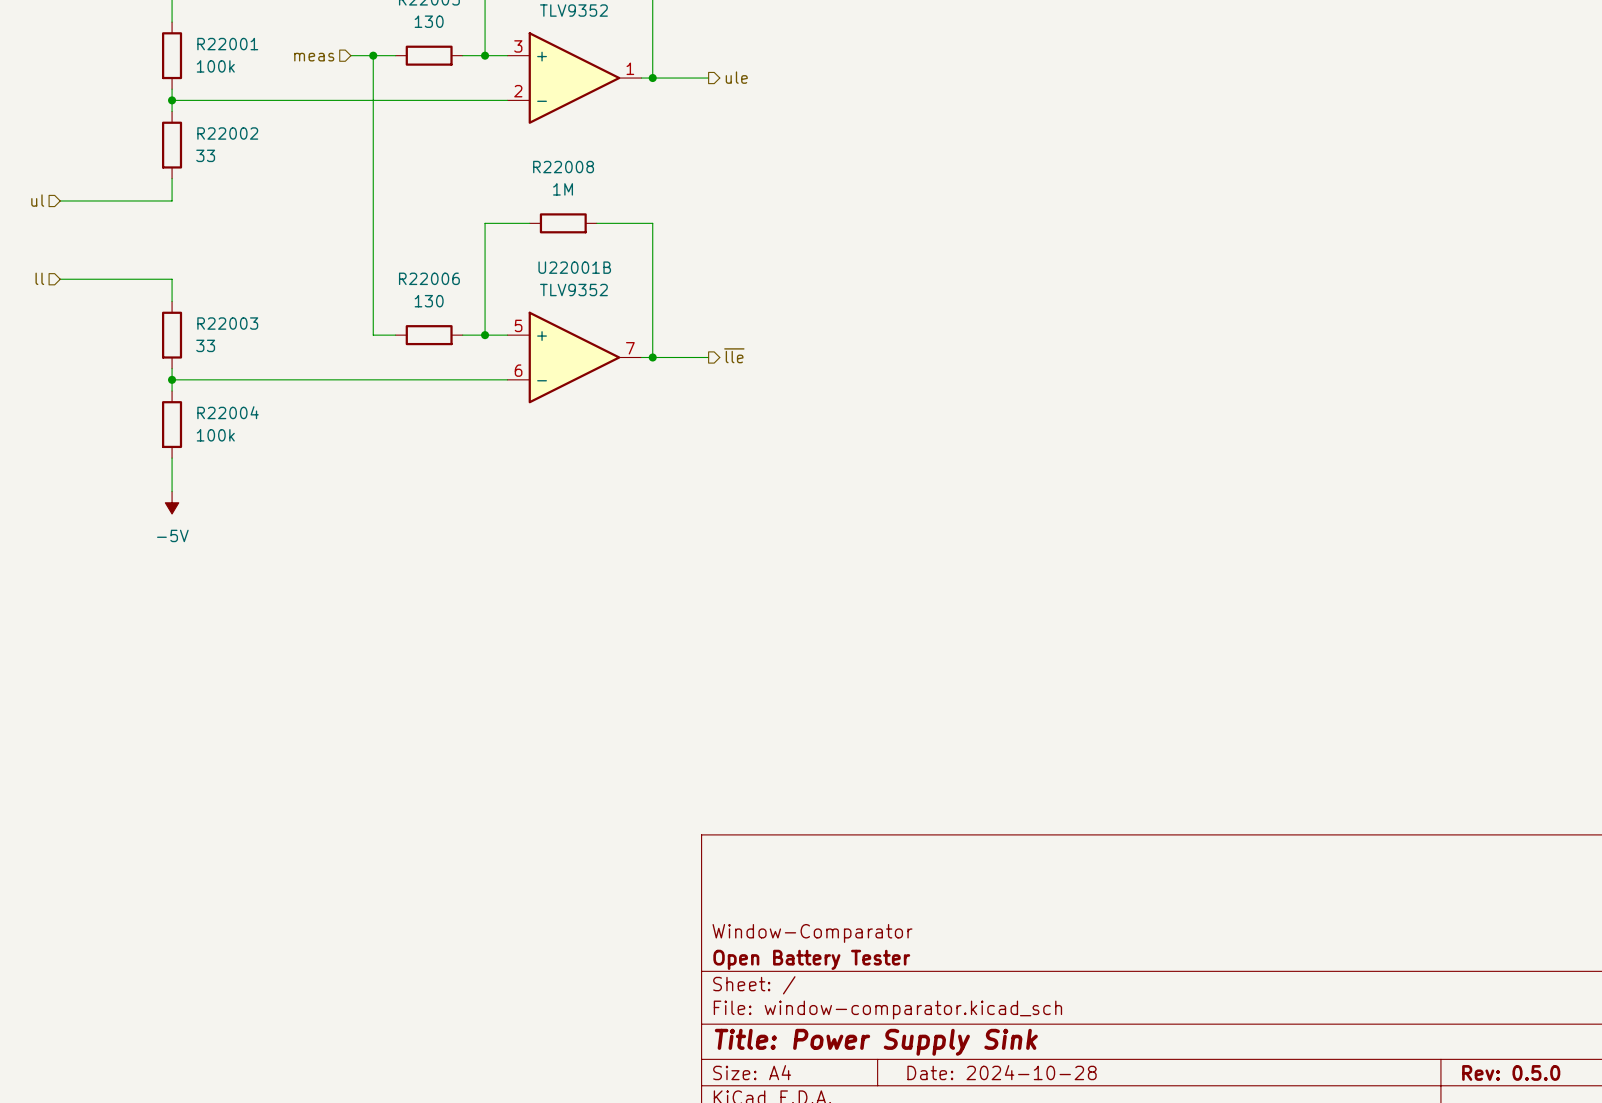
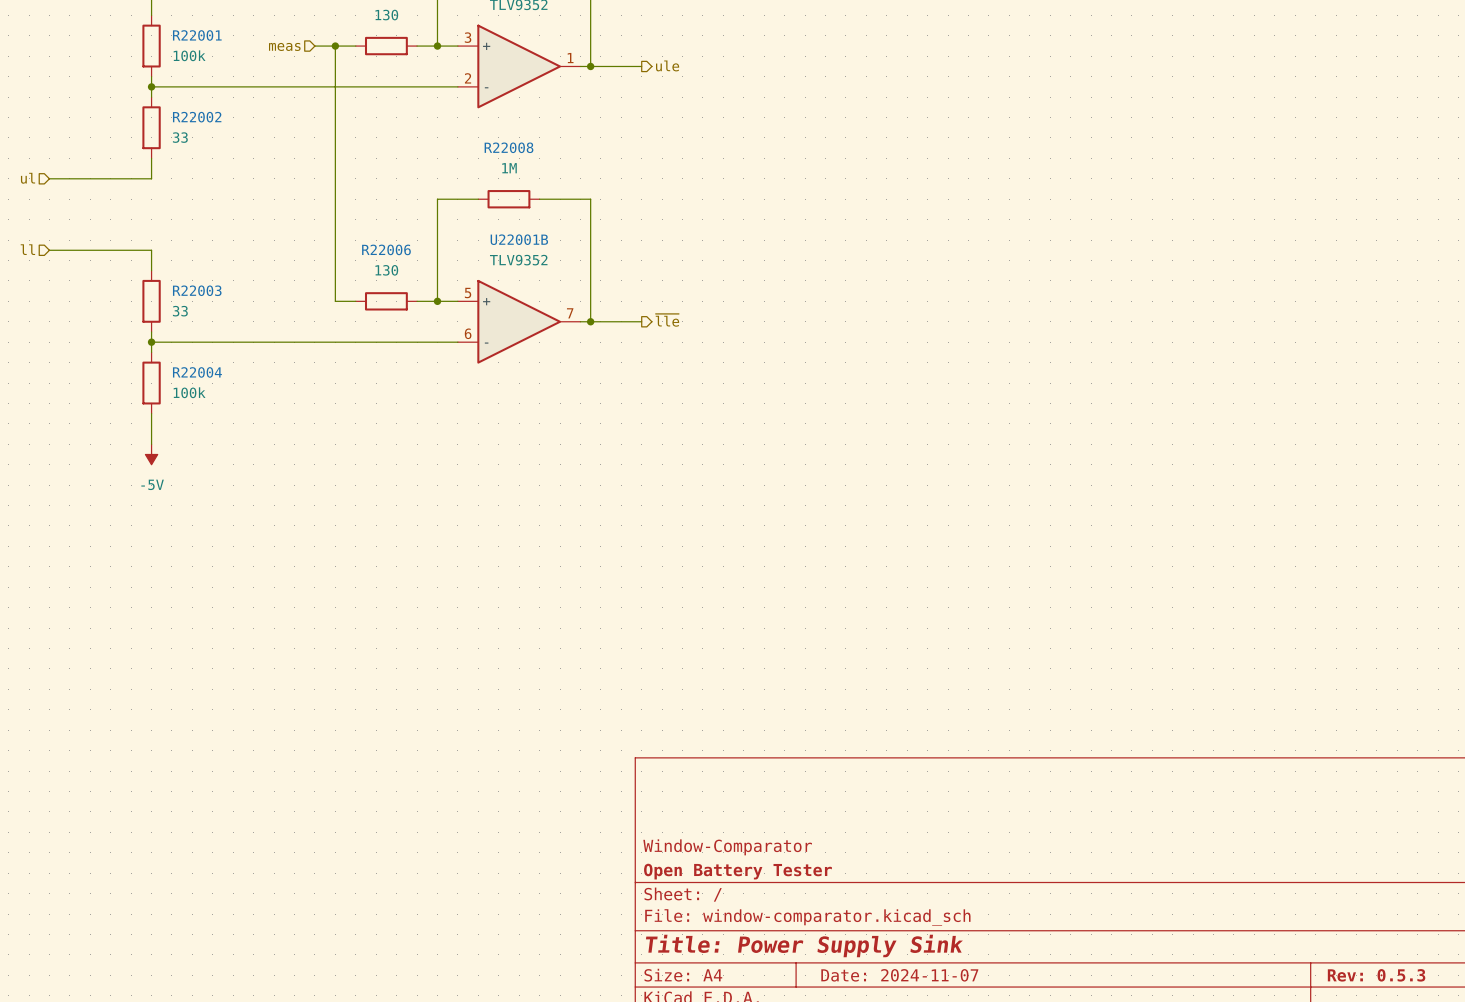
title block: Date: 2024-10-28 (1002, 1072) -> Date: 2024-11-07 (899, 975)
title block: Rev: 0.5.0 (1511, 1072) -> Rev: 0.5.3 (1376, 975)

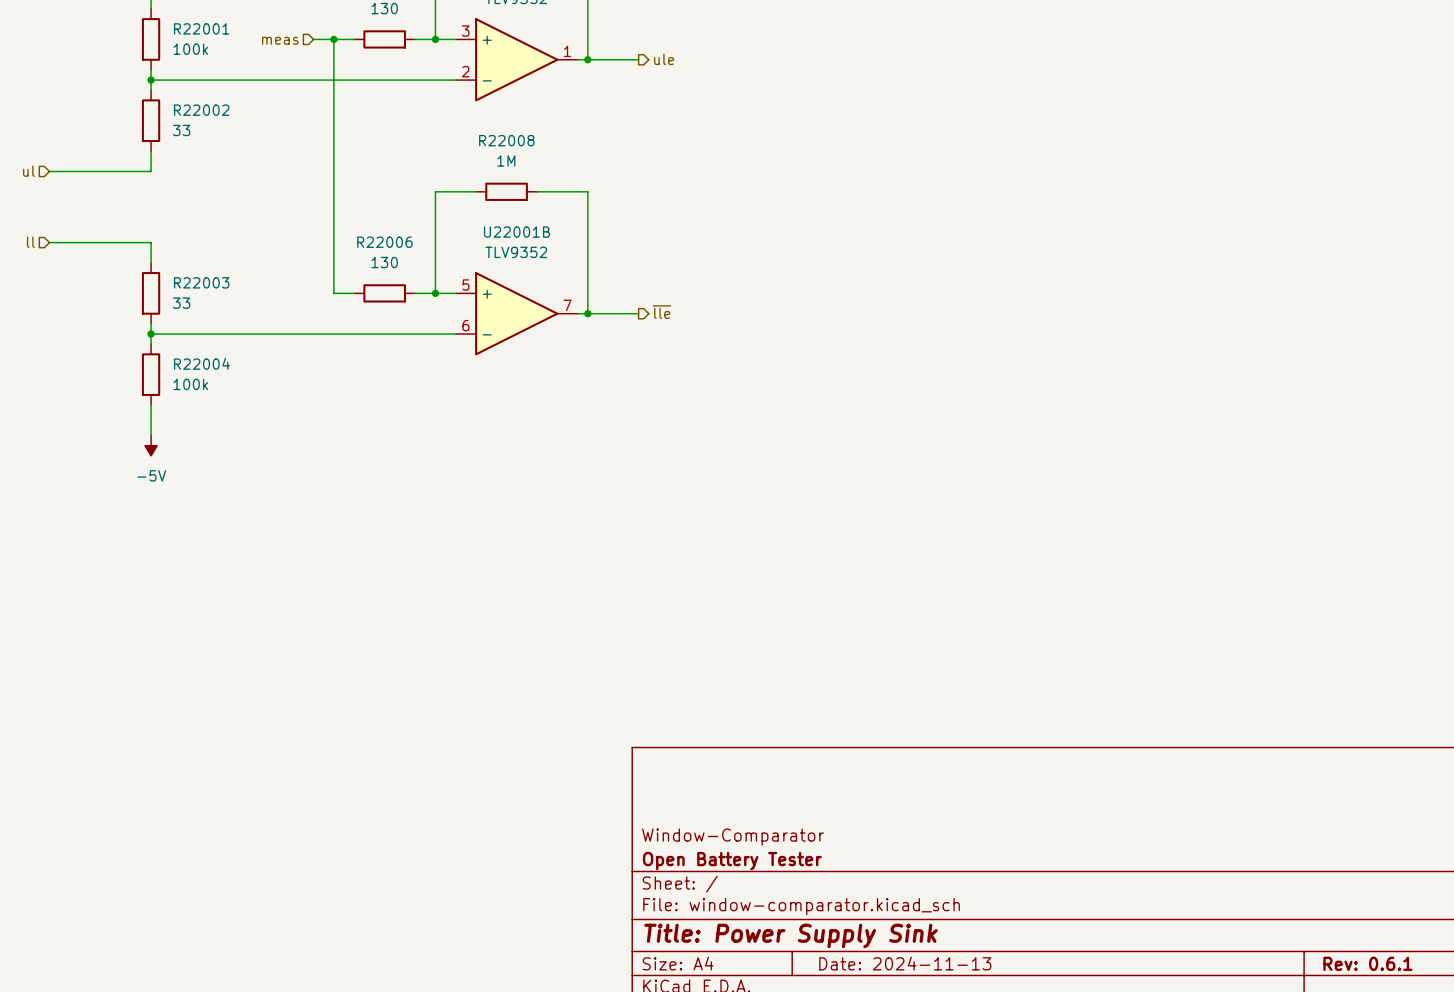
title block: Date: 2024-11-07 (899, 975) -> Date: 2024-11-13 (905, 963)
title block: Rev: 0.5.3 (1376, 975) -> Rev: 0.6.1 (1367, 963)

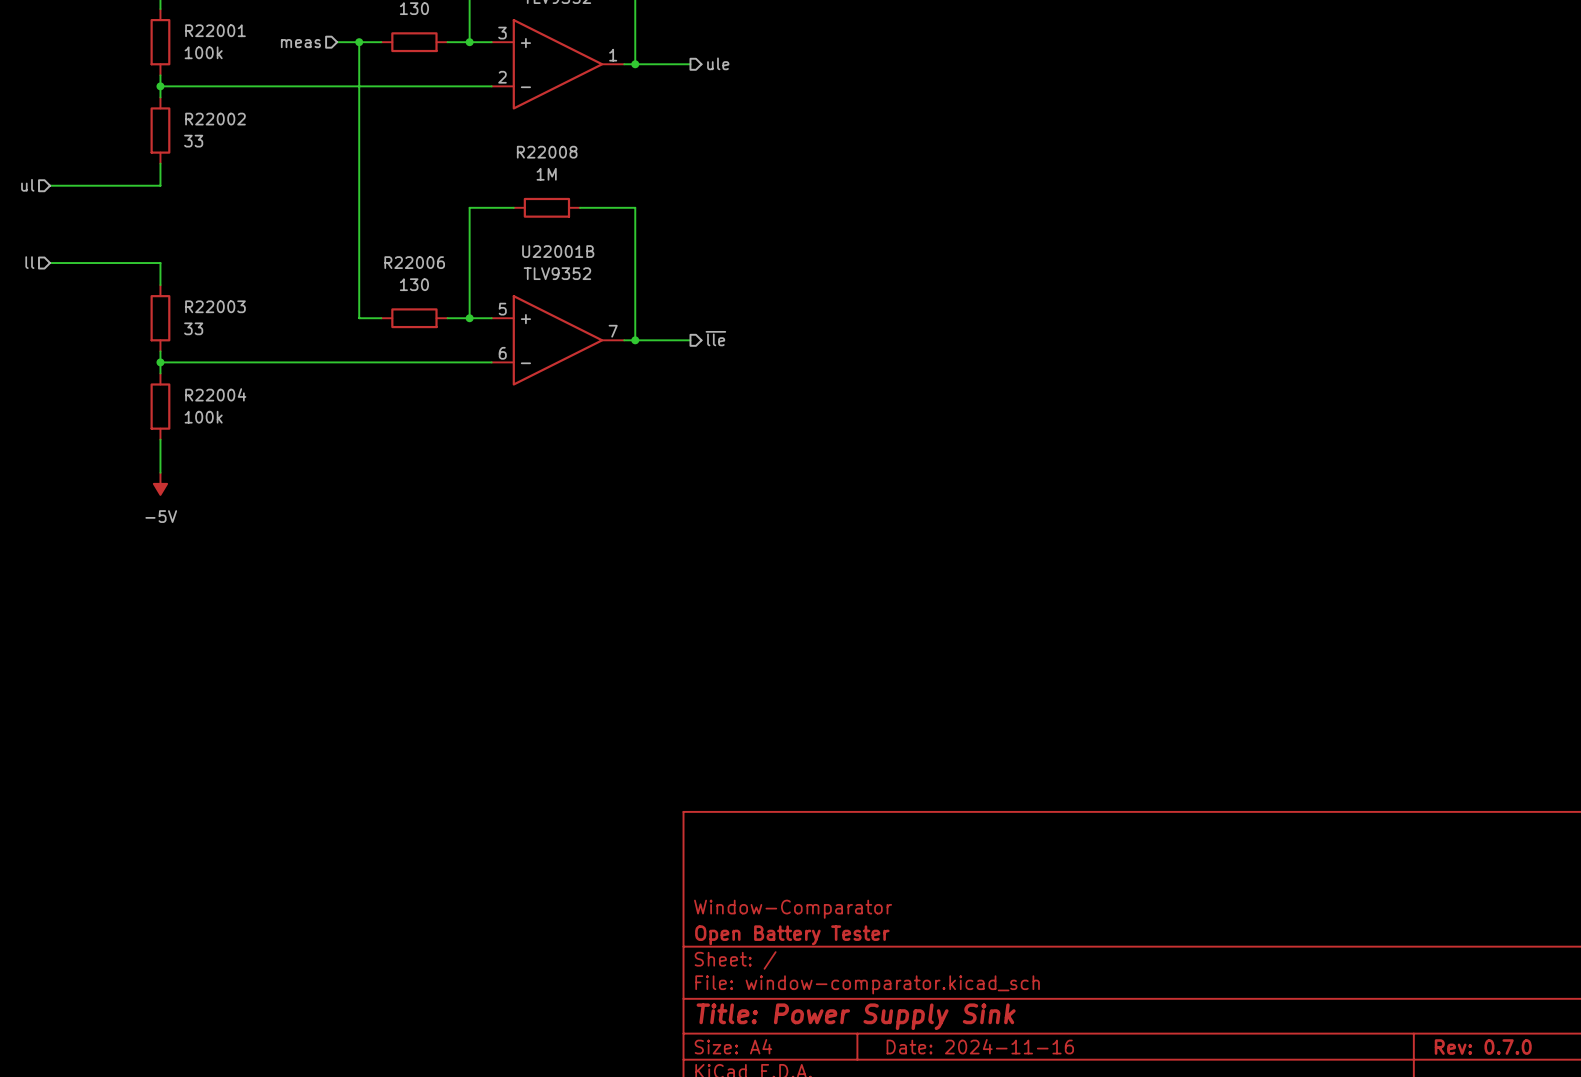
title block: Date: 2024-11-13 (905, 963) -> Date: 2024-11-16 (980, 1046)
title block: Rev: 0.6.1 (1367, 963) -> Rev: 0.7.0 (1483, 1047)

